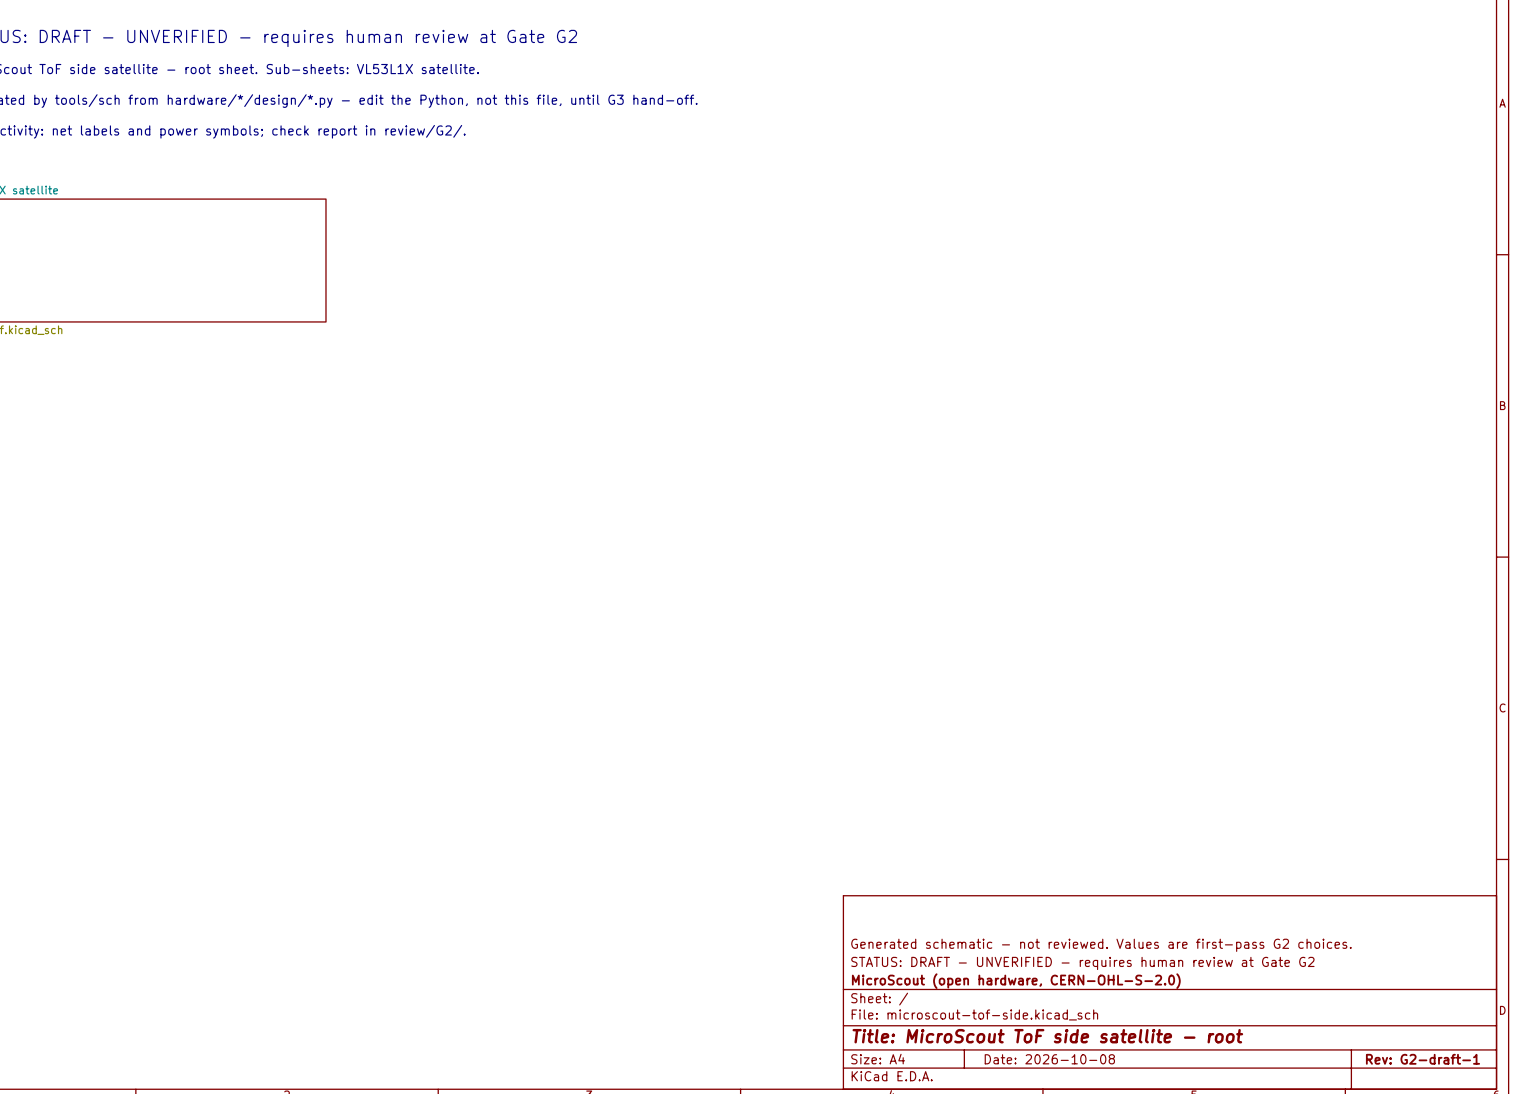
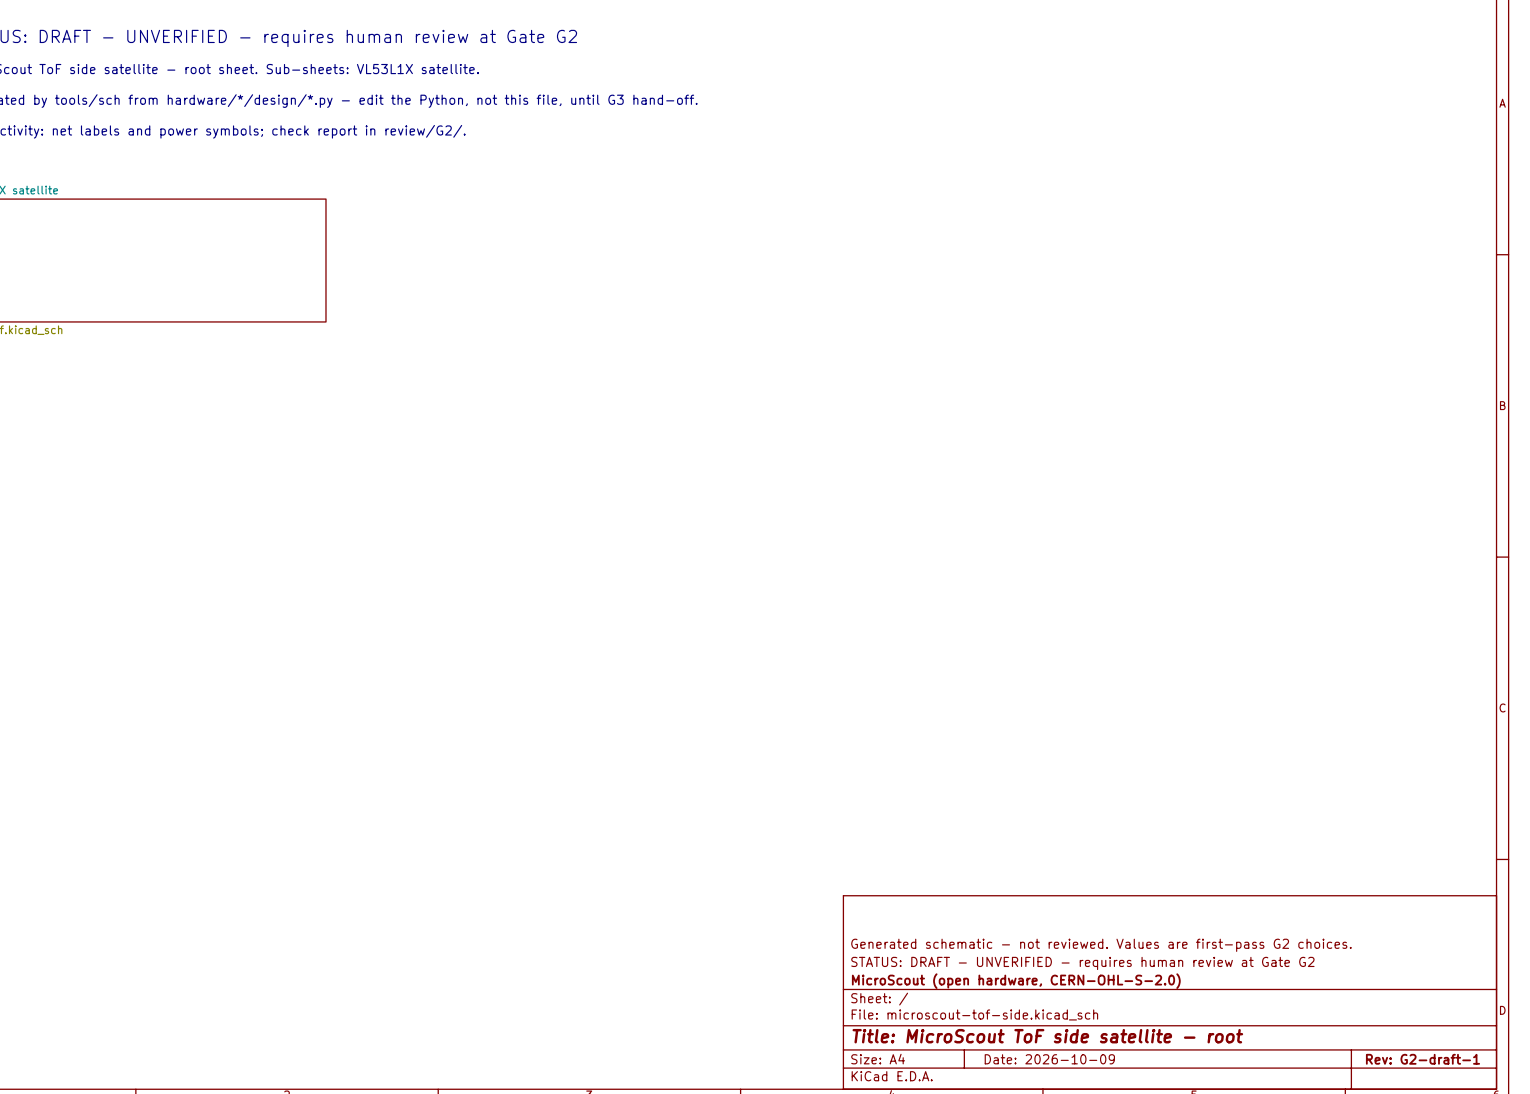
title block: Date: 2026-10-08 (1049, 1059) -> Date: 2026-10-09 (1049, 1059)

